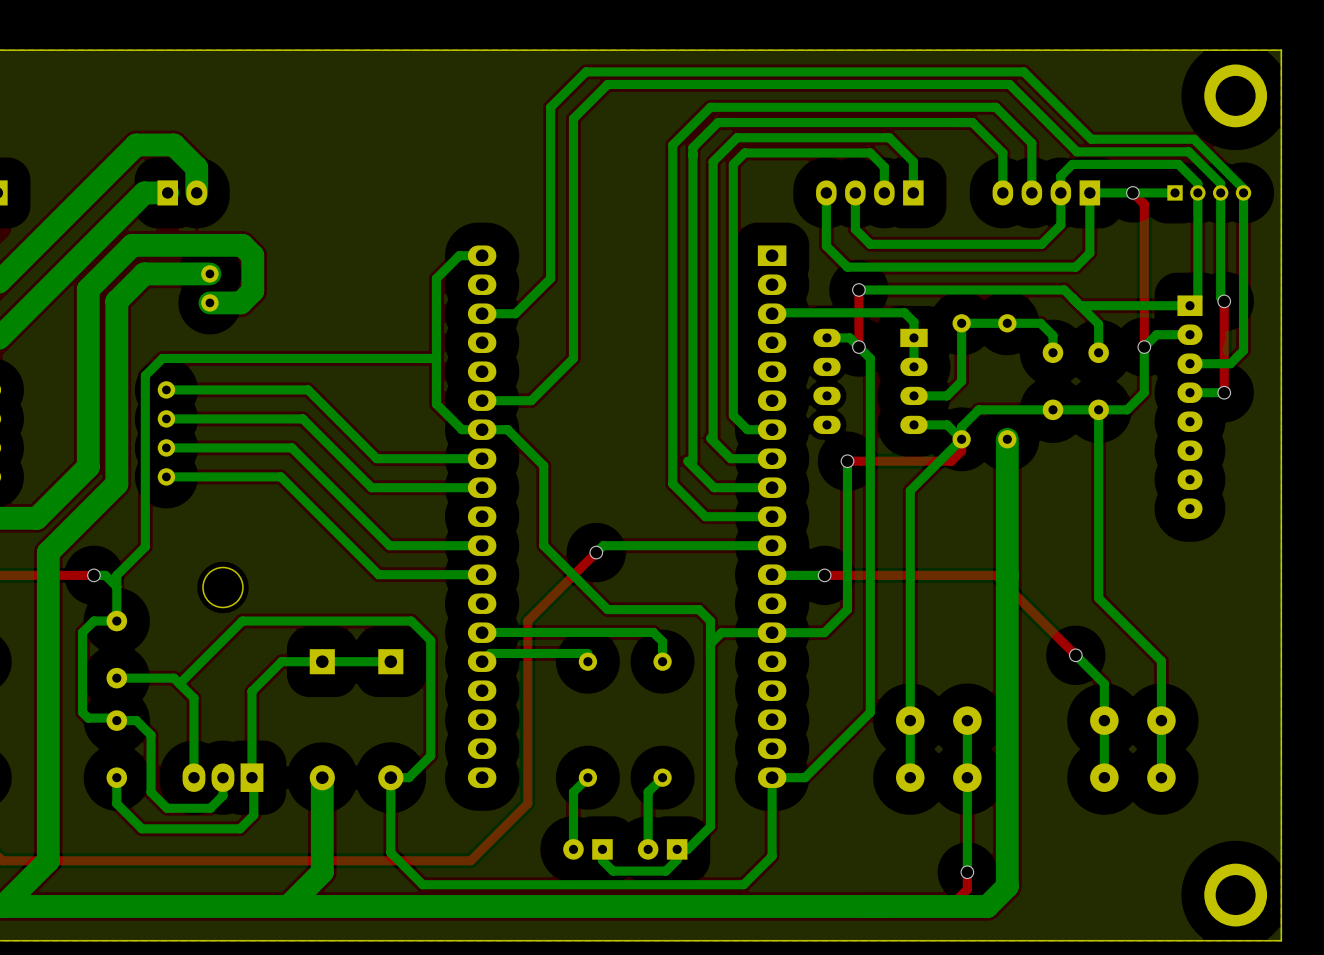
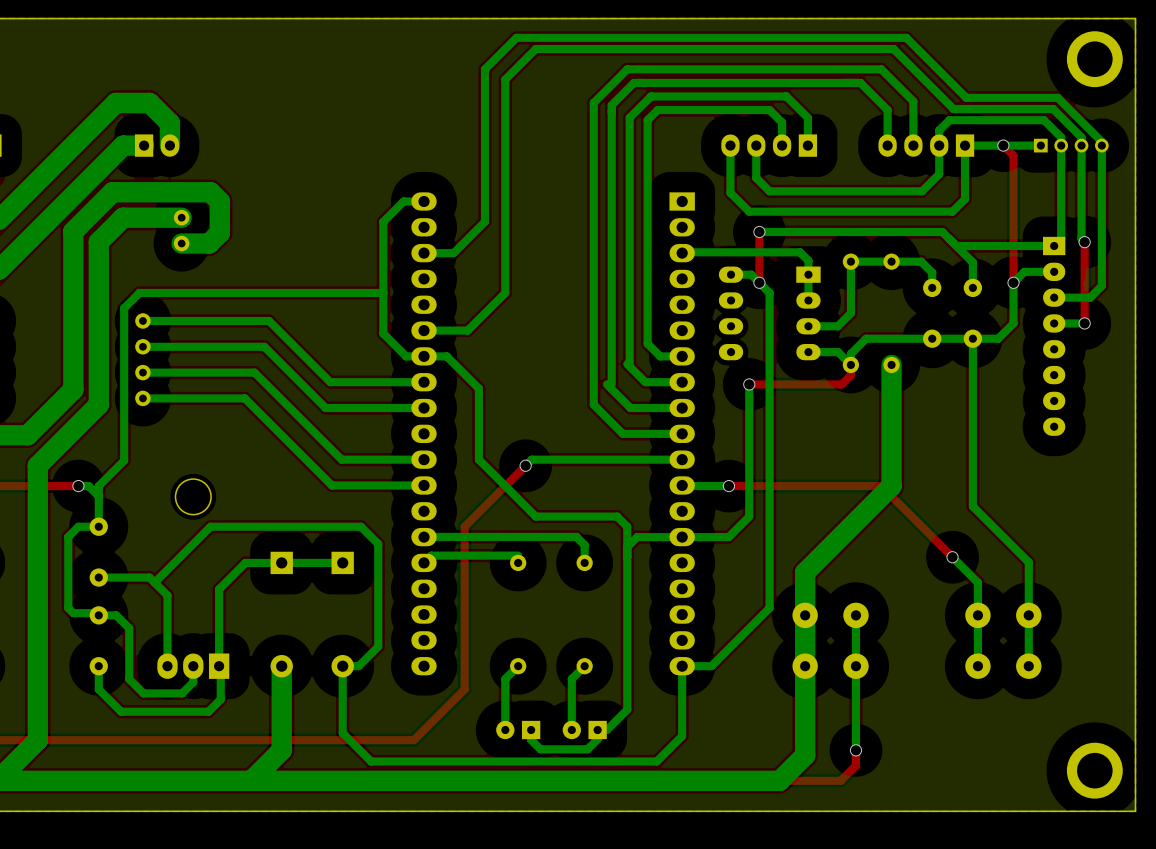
bottom track: (961, 439) (910, 490) (910, 672) -> (891, 486) (805, 572)
bottom track: (1007, 575) (1007, 886) (987, 906) (881, 906) -> (805, 666) (805, 755) (779, 780)
bottom track width: thin (910, 672) (910, 777) -> thick (805, 572) (805, 666)

